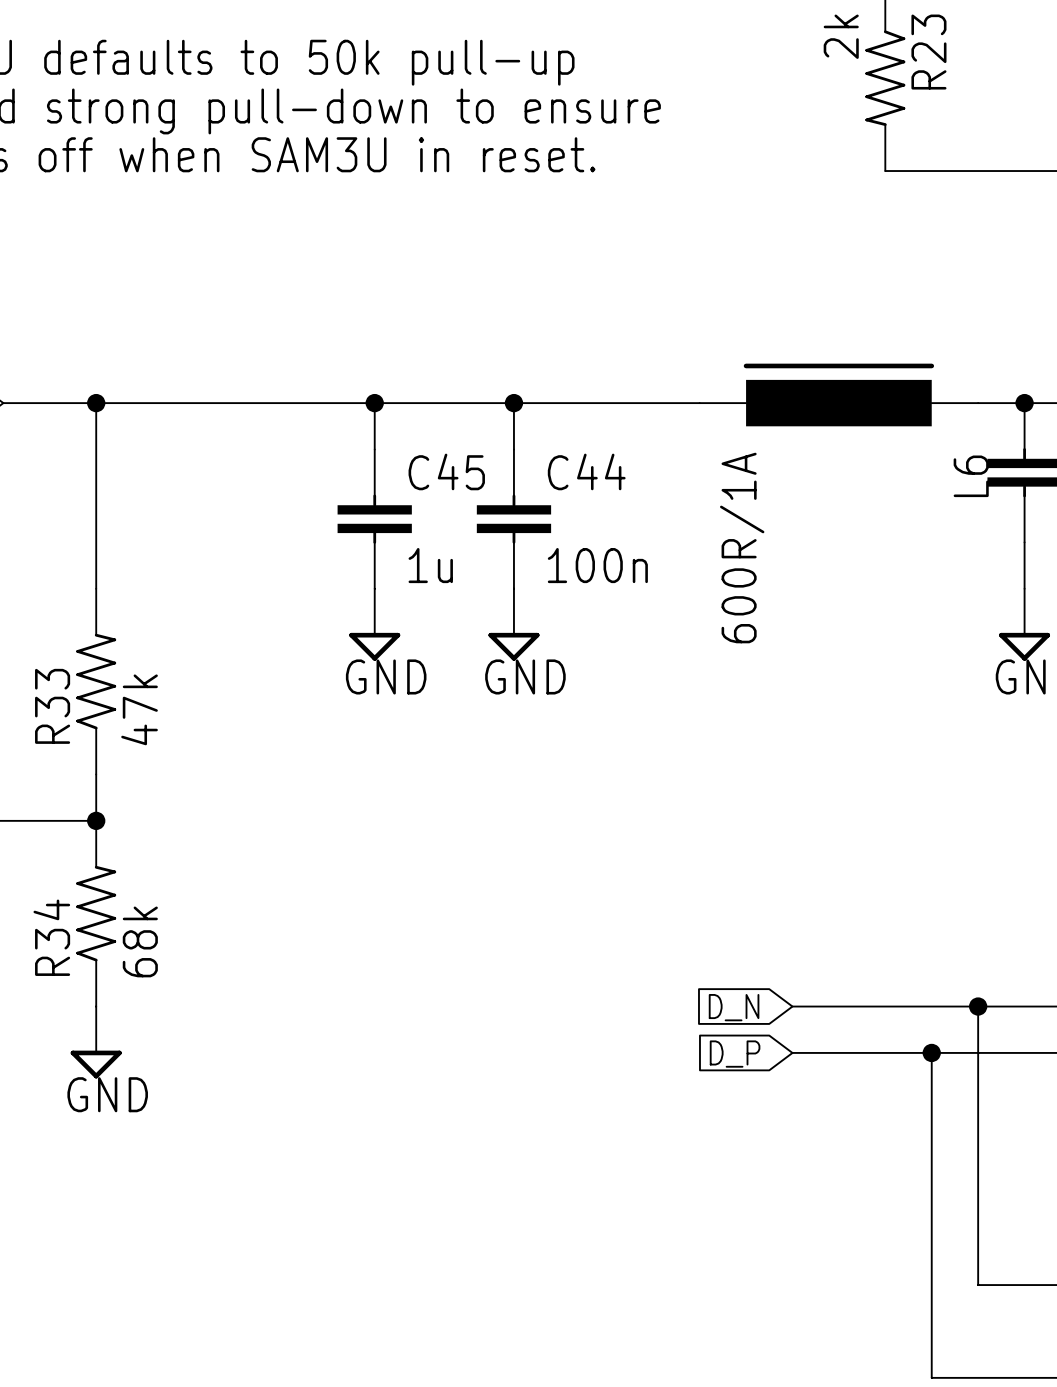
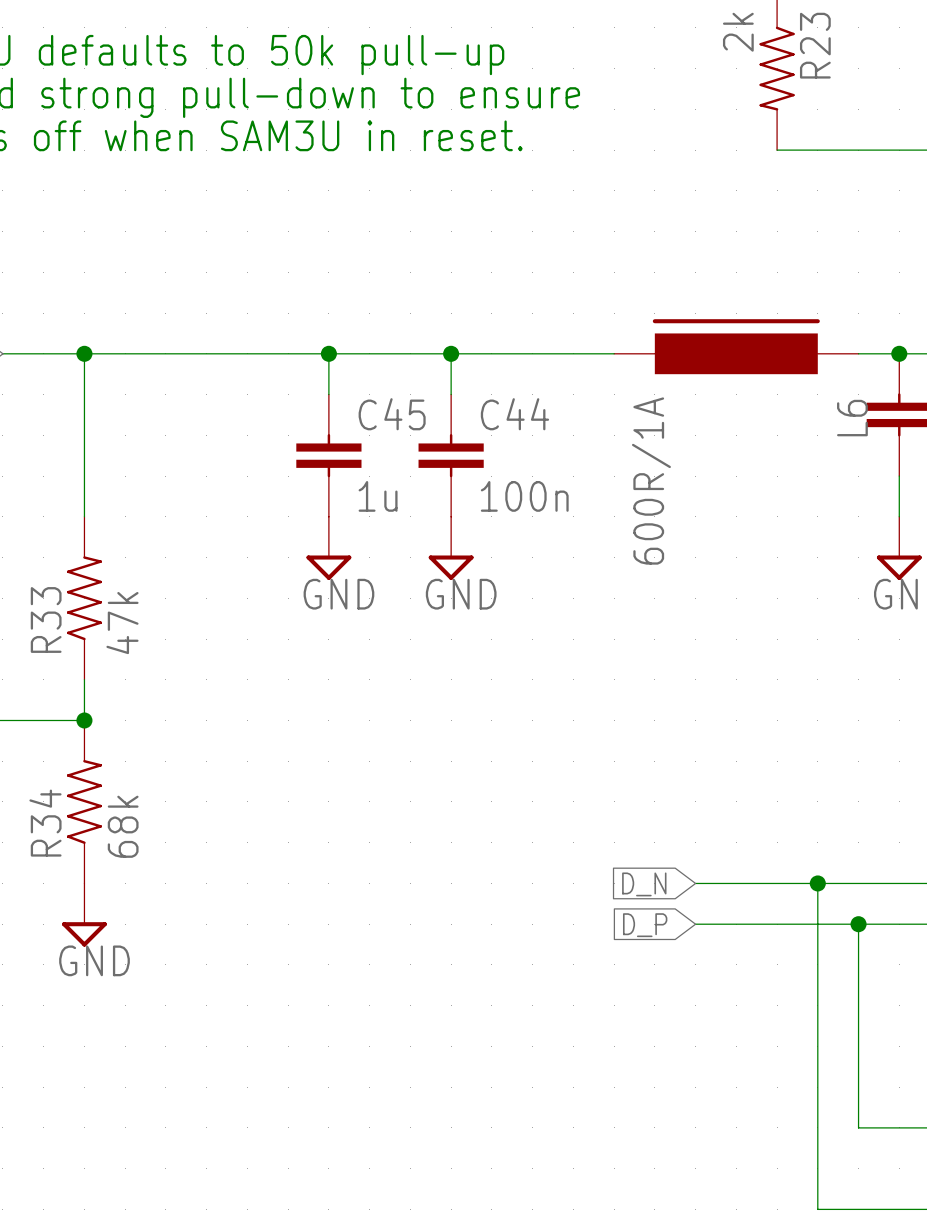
junction: none -> (817, 883)
wire: (978, 1006) (978, 1052) -> (817, 883) (817, 924)
junction: (978, 1006) -> none
junction: (931, 1052) -> none
junction: none -> (858, 924)

